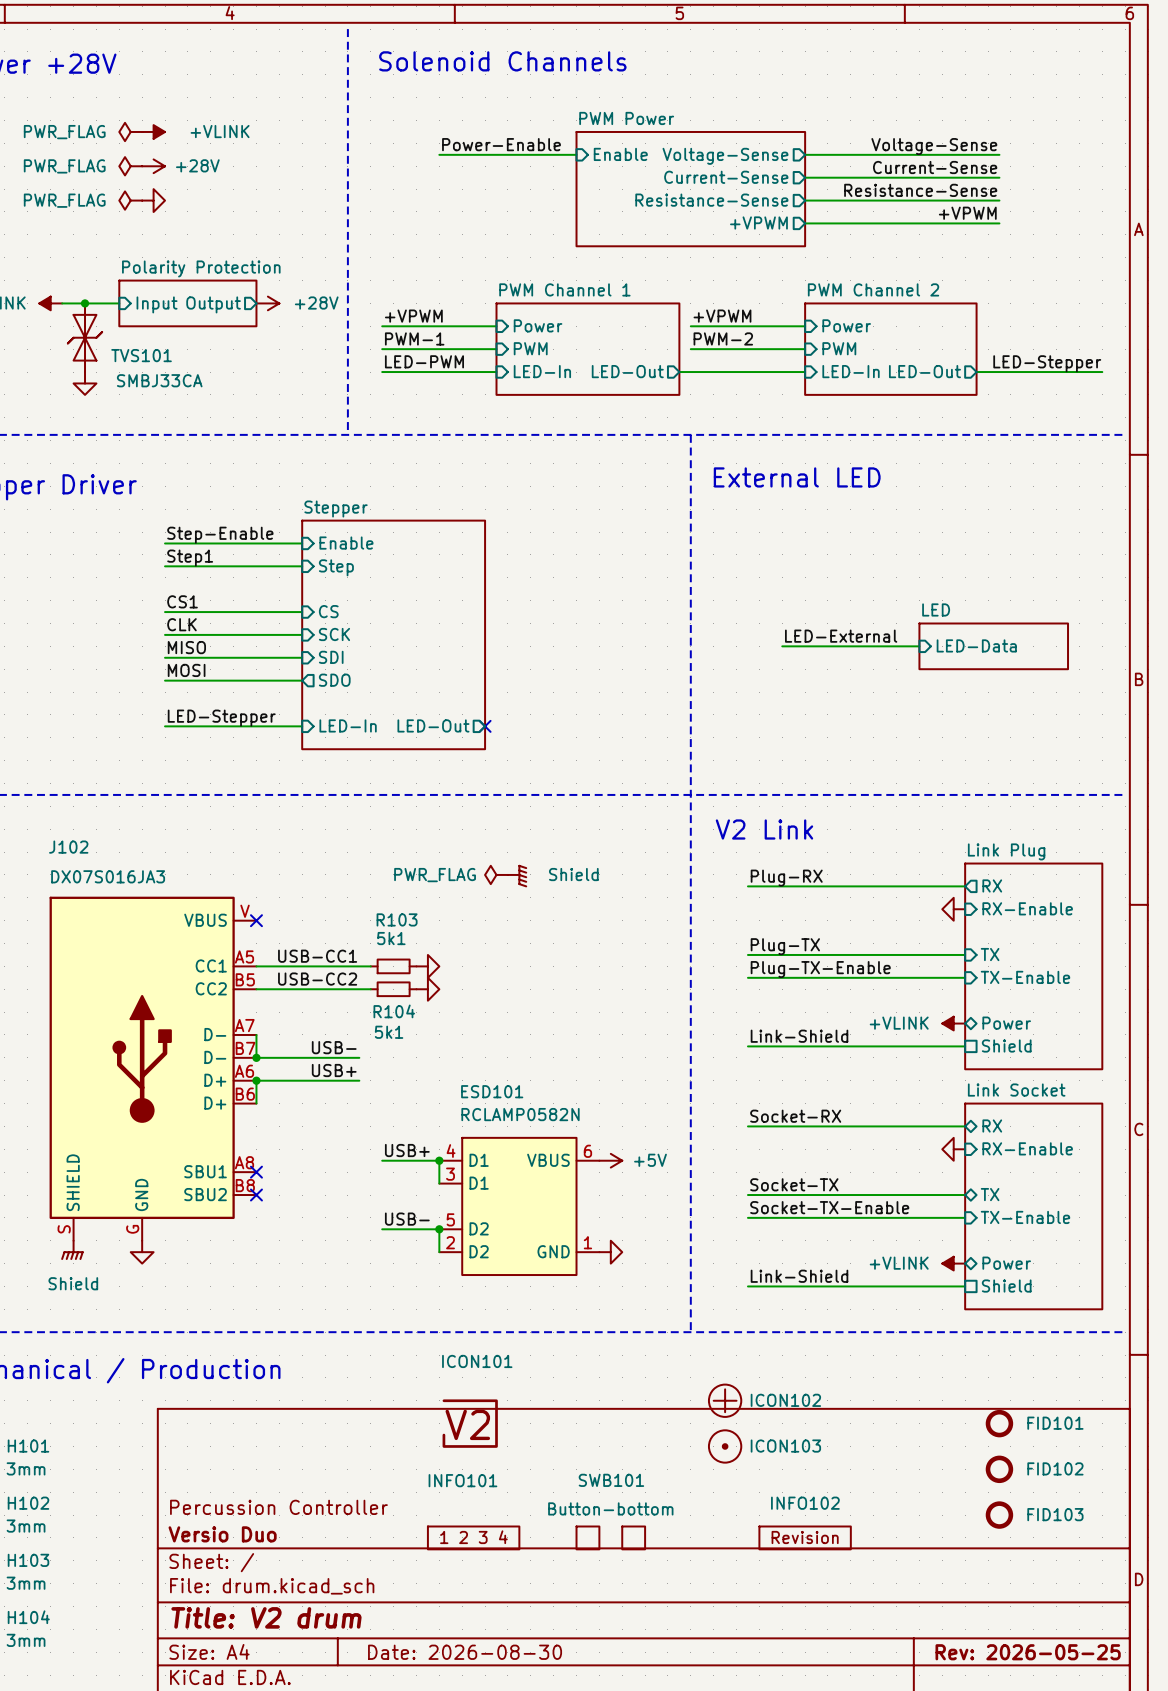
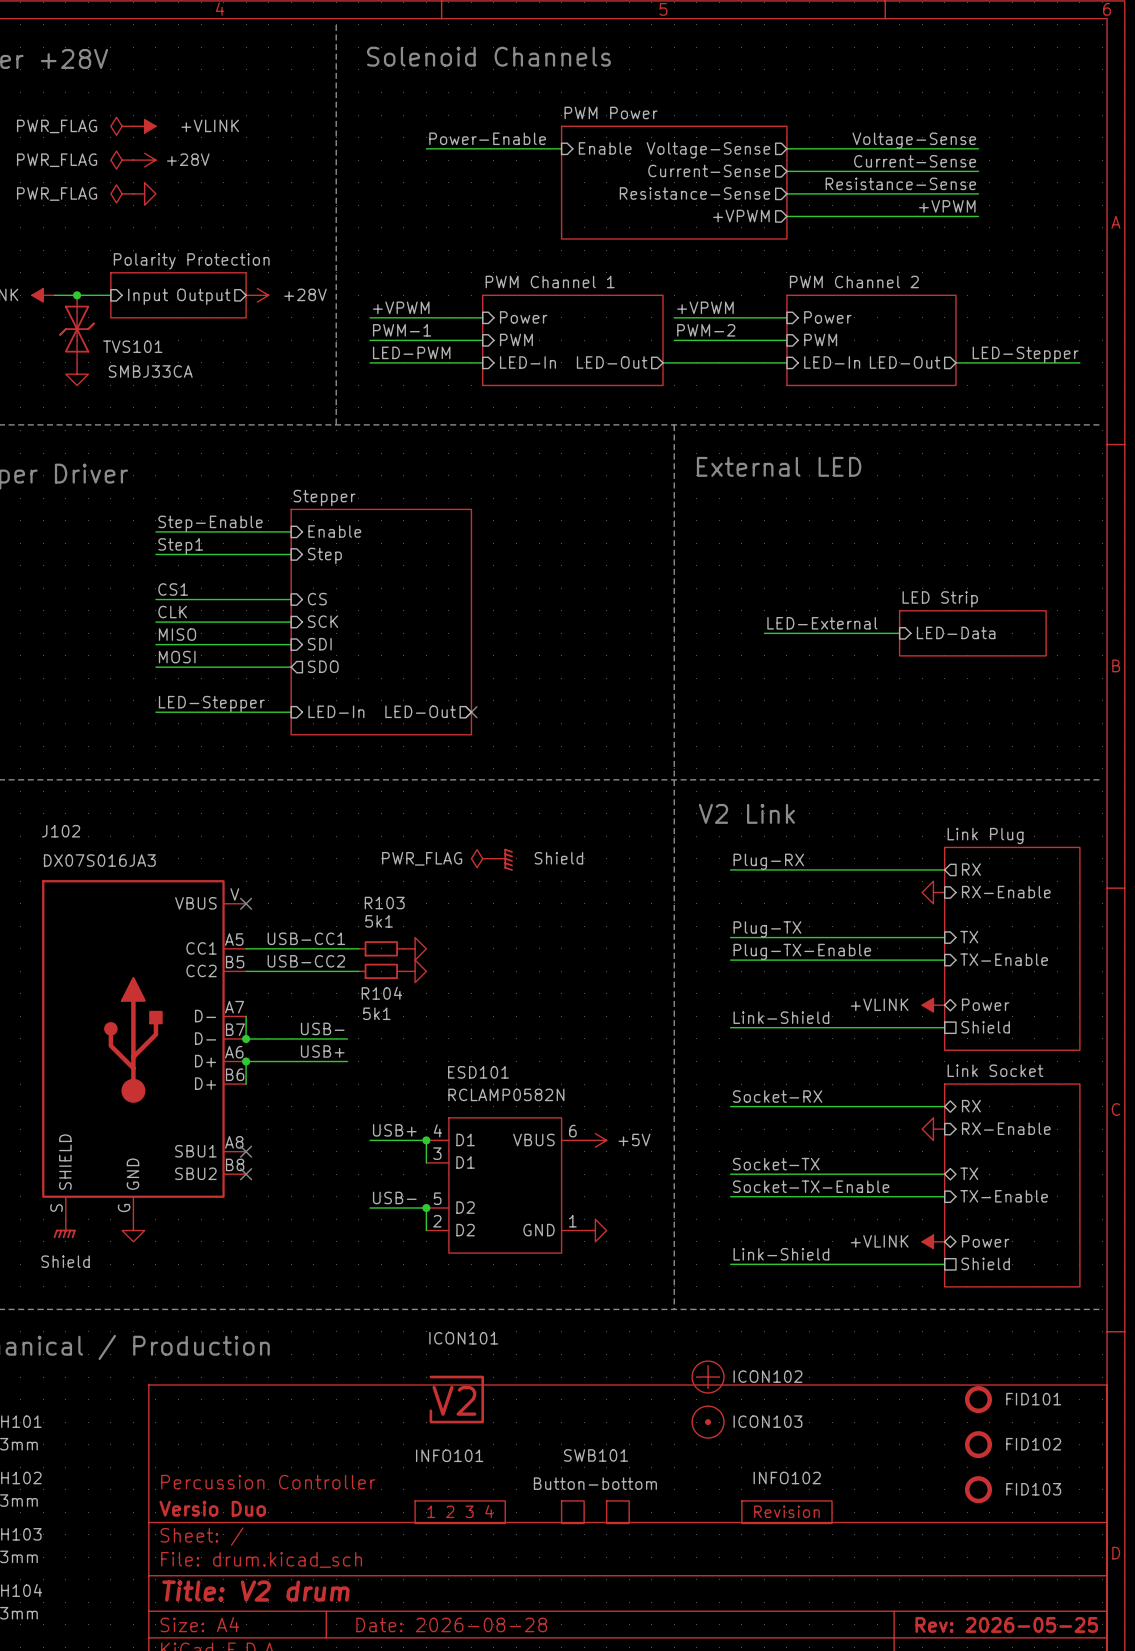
sheet LED name: LED (936, 609) -> LED Strip (940, 599)
title block: Date: 2026-08-30 (465, 1652) -> Date: 2026-08-28 (451, 1624)

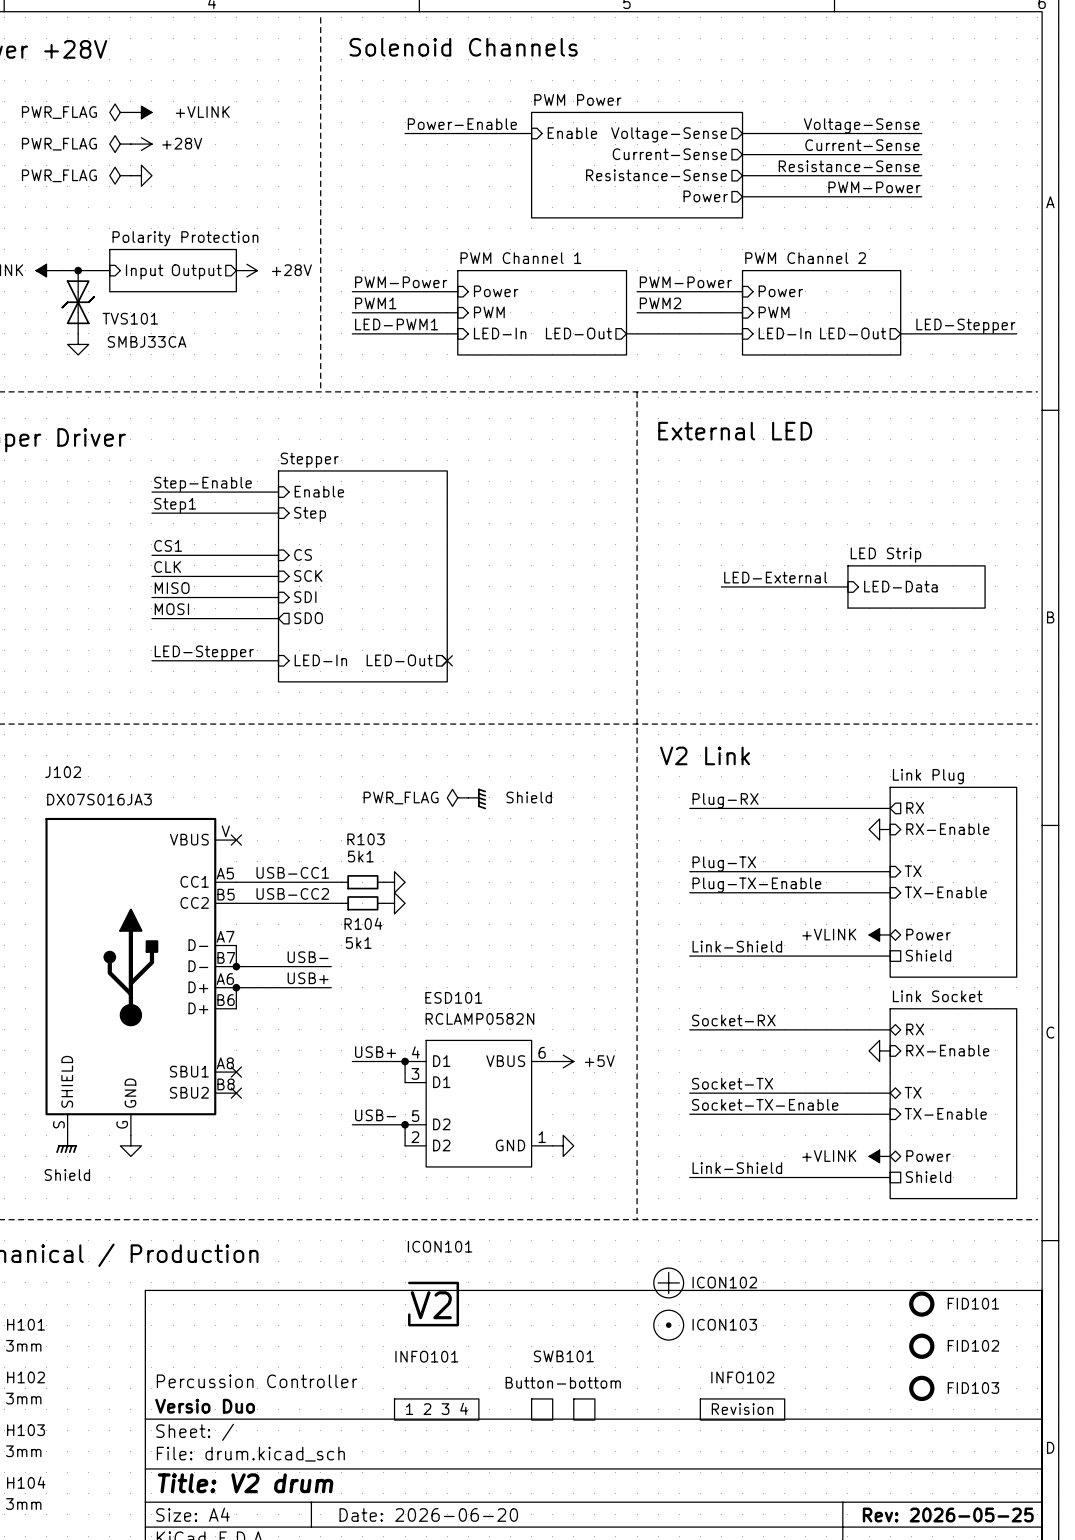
label: +VPWM (947, 206) -> PWM-Power (874, 187)
sheet pin: +VPWM (741, 216) -> Power (705, 196)
label: +VPWM (401, 307) -> PWM-Power (401, 282)
label: +VPWM (705, 307) -> PWM-Power (685, 282)
label: PWM-1 (402, 330) -> PWM1 (375, 303)
label: PWM-2 (706, 330) -> PWM2 (660, 303)
label: LED-PWM (411, 352) -> LED-PWM1 (396, 324)
title block: Date: 2026-08-28 (451, 1624) -> Date: 2026-06-20 (428, 1514)

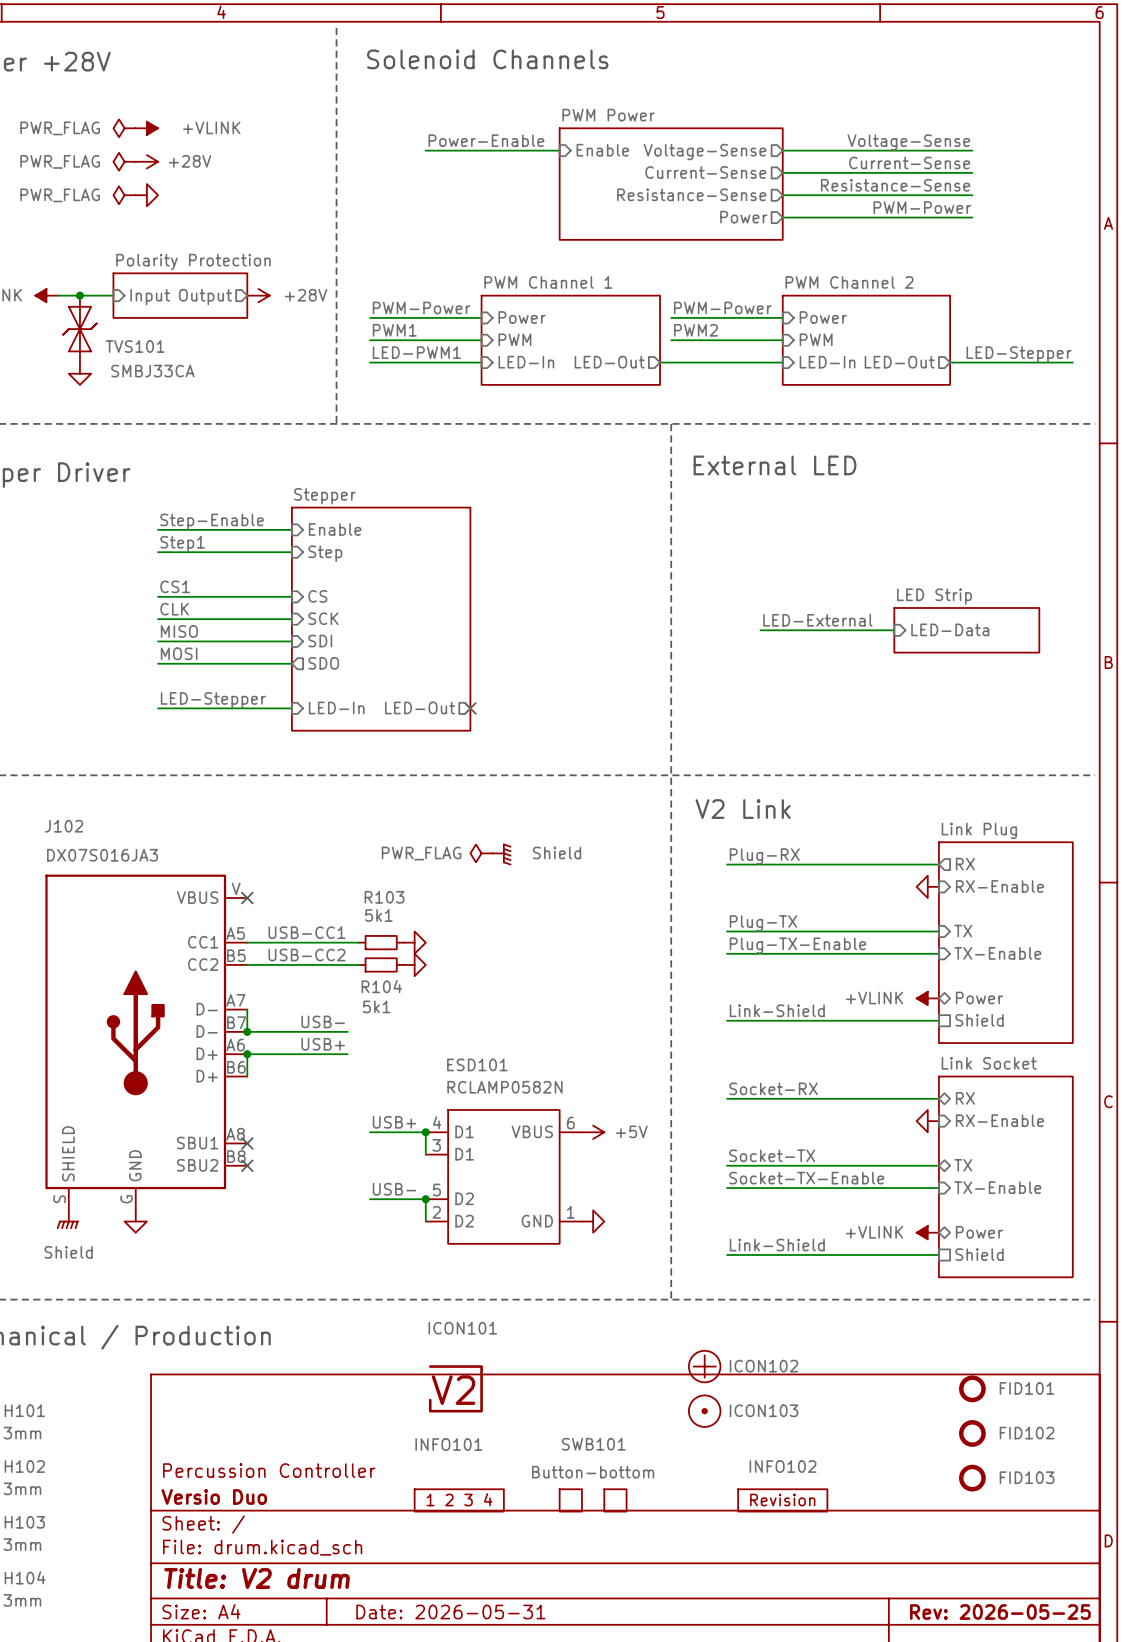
title block: Date: 2026-06-20 (428, 1514) -> Date: 2026-05-31 (450, 1612)

